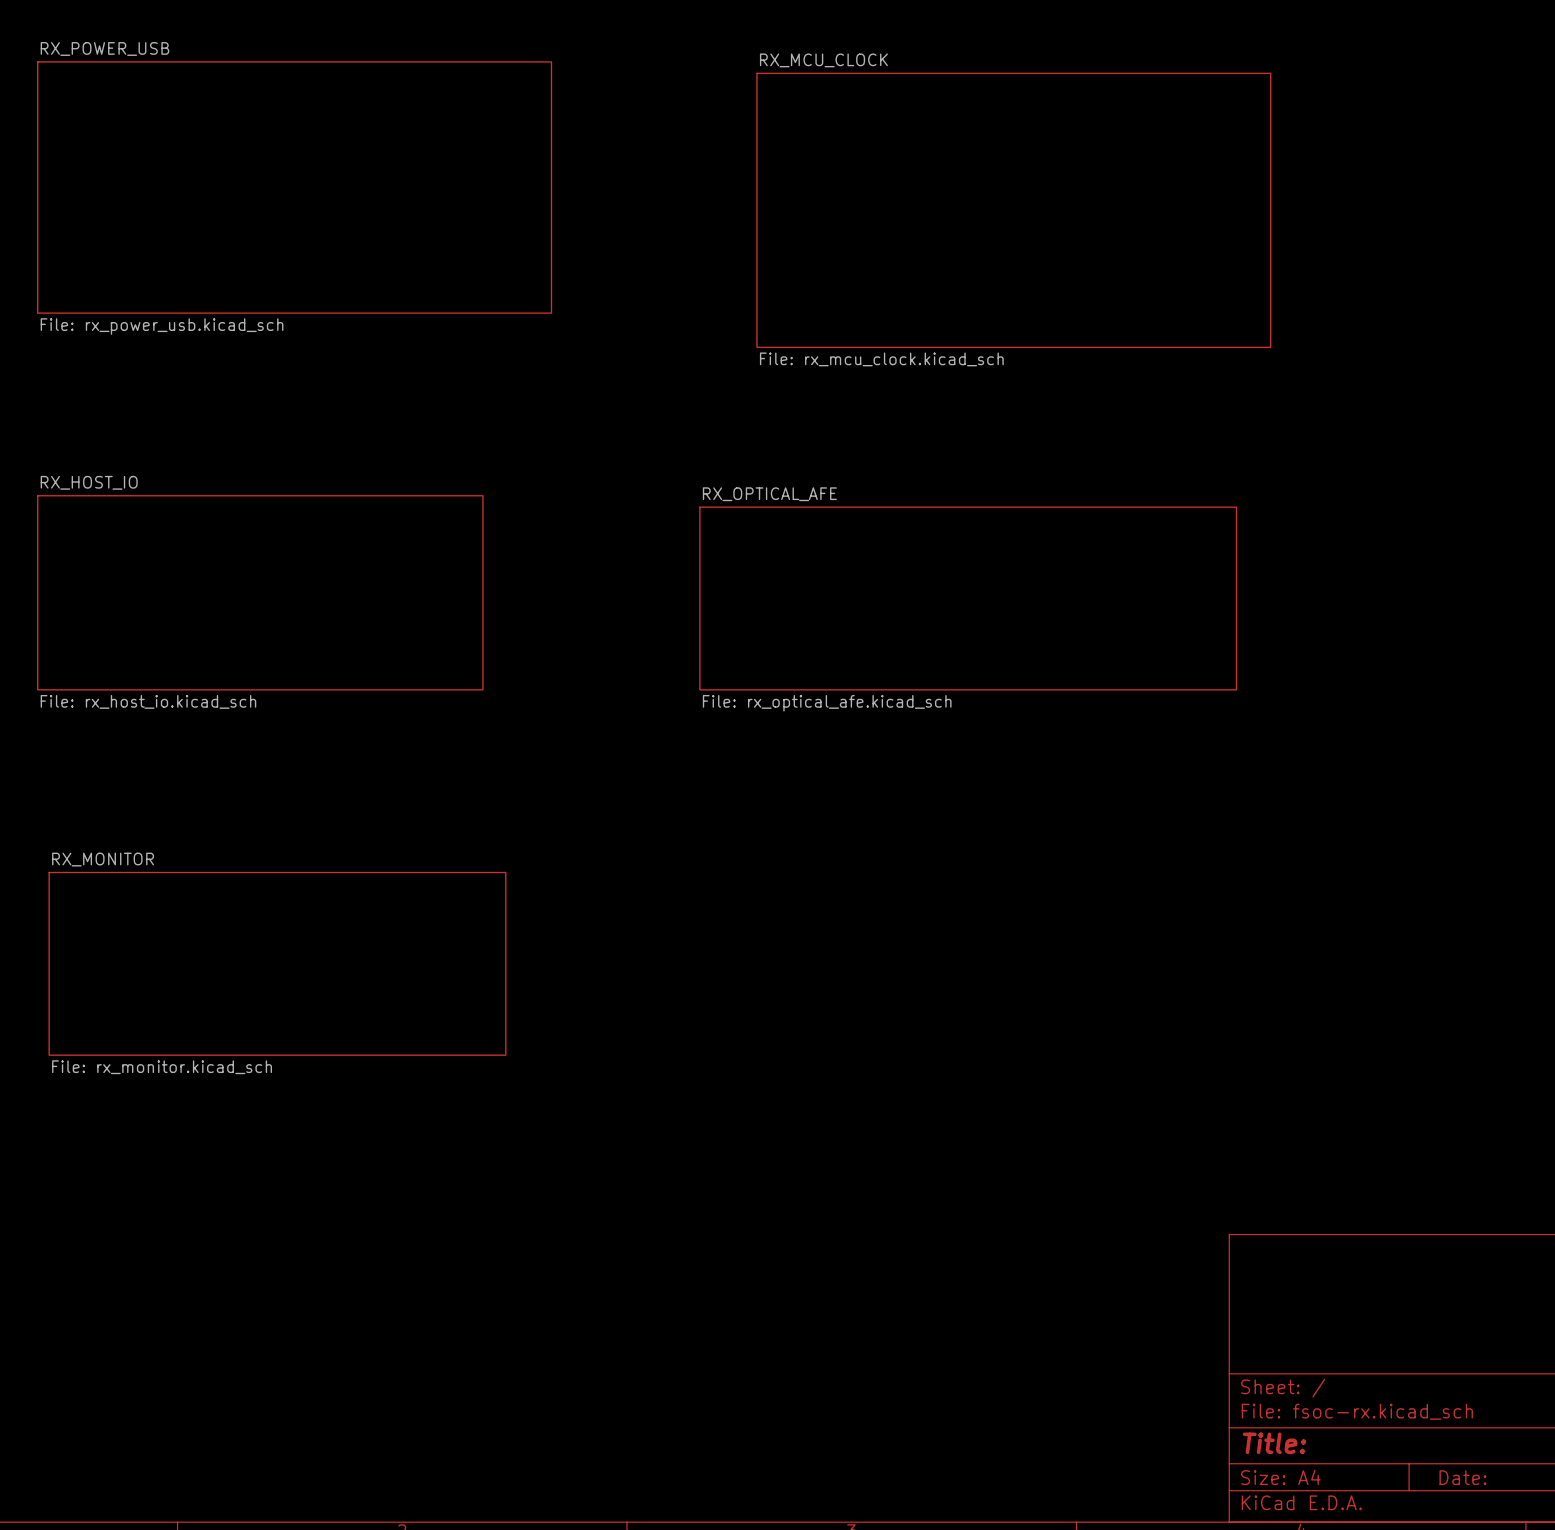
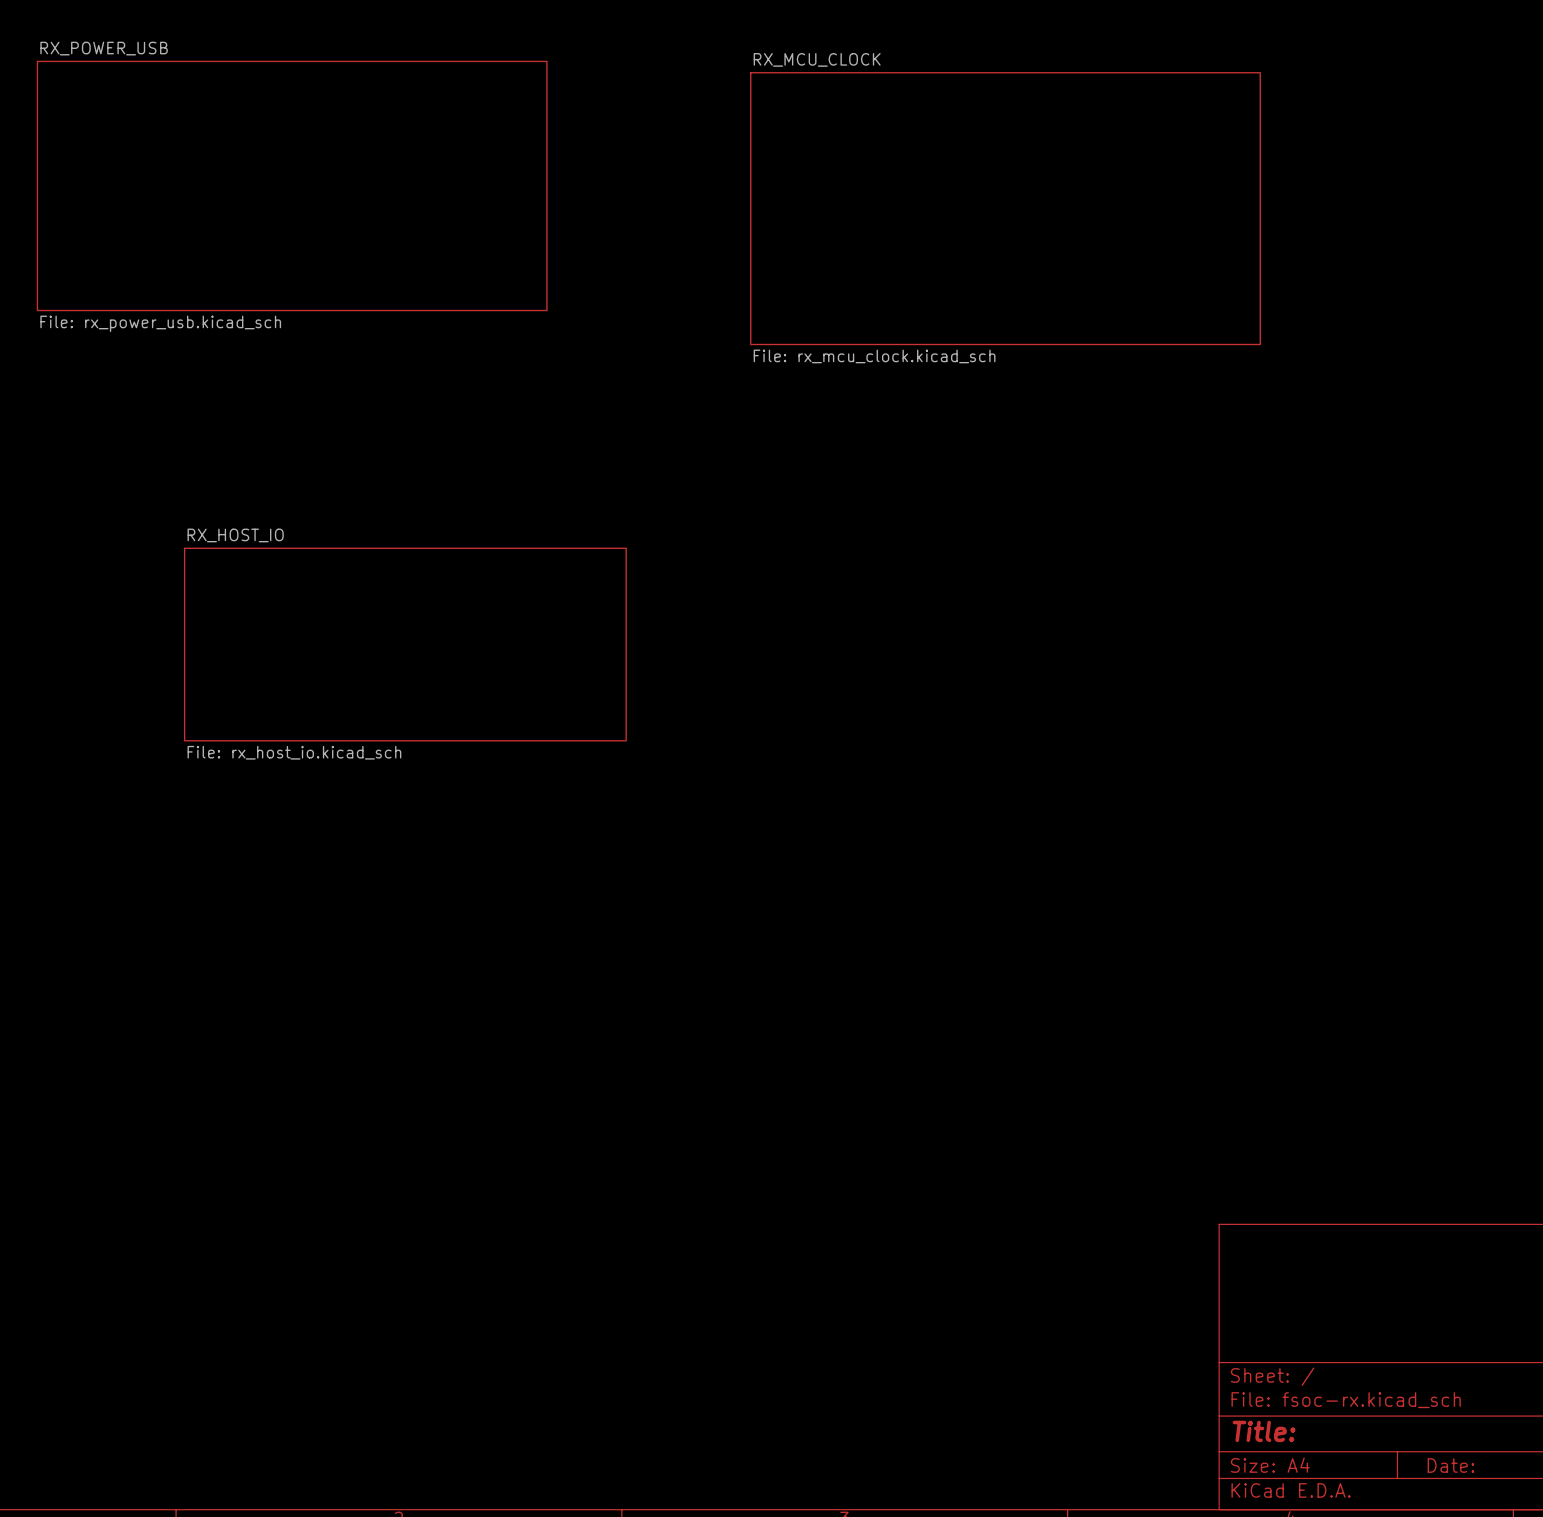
sheet RX_HOST_IO position: (260, 592) -> (405, 644)
sheet RX_OPTICAL_AFE: File: rx_optical_afe.kicad_sch (968, 598) -> none
sheet RX_MONITOR: File: rx_monitor.kicad_sch (277, 963) -> none

